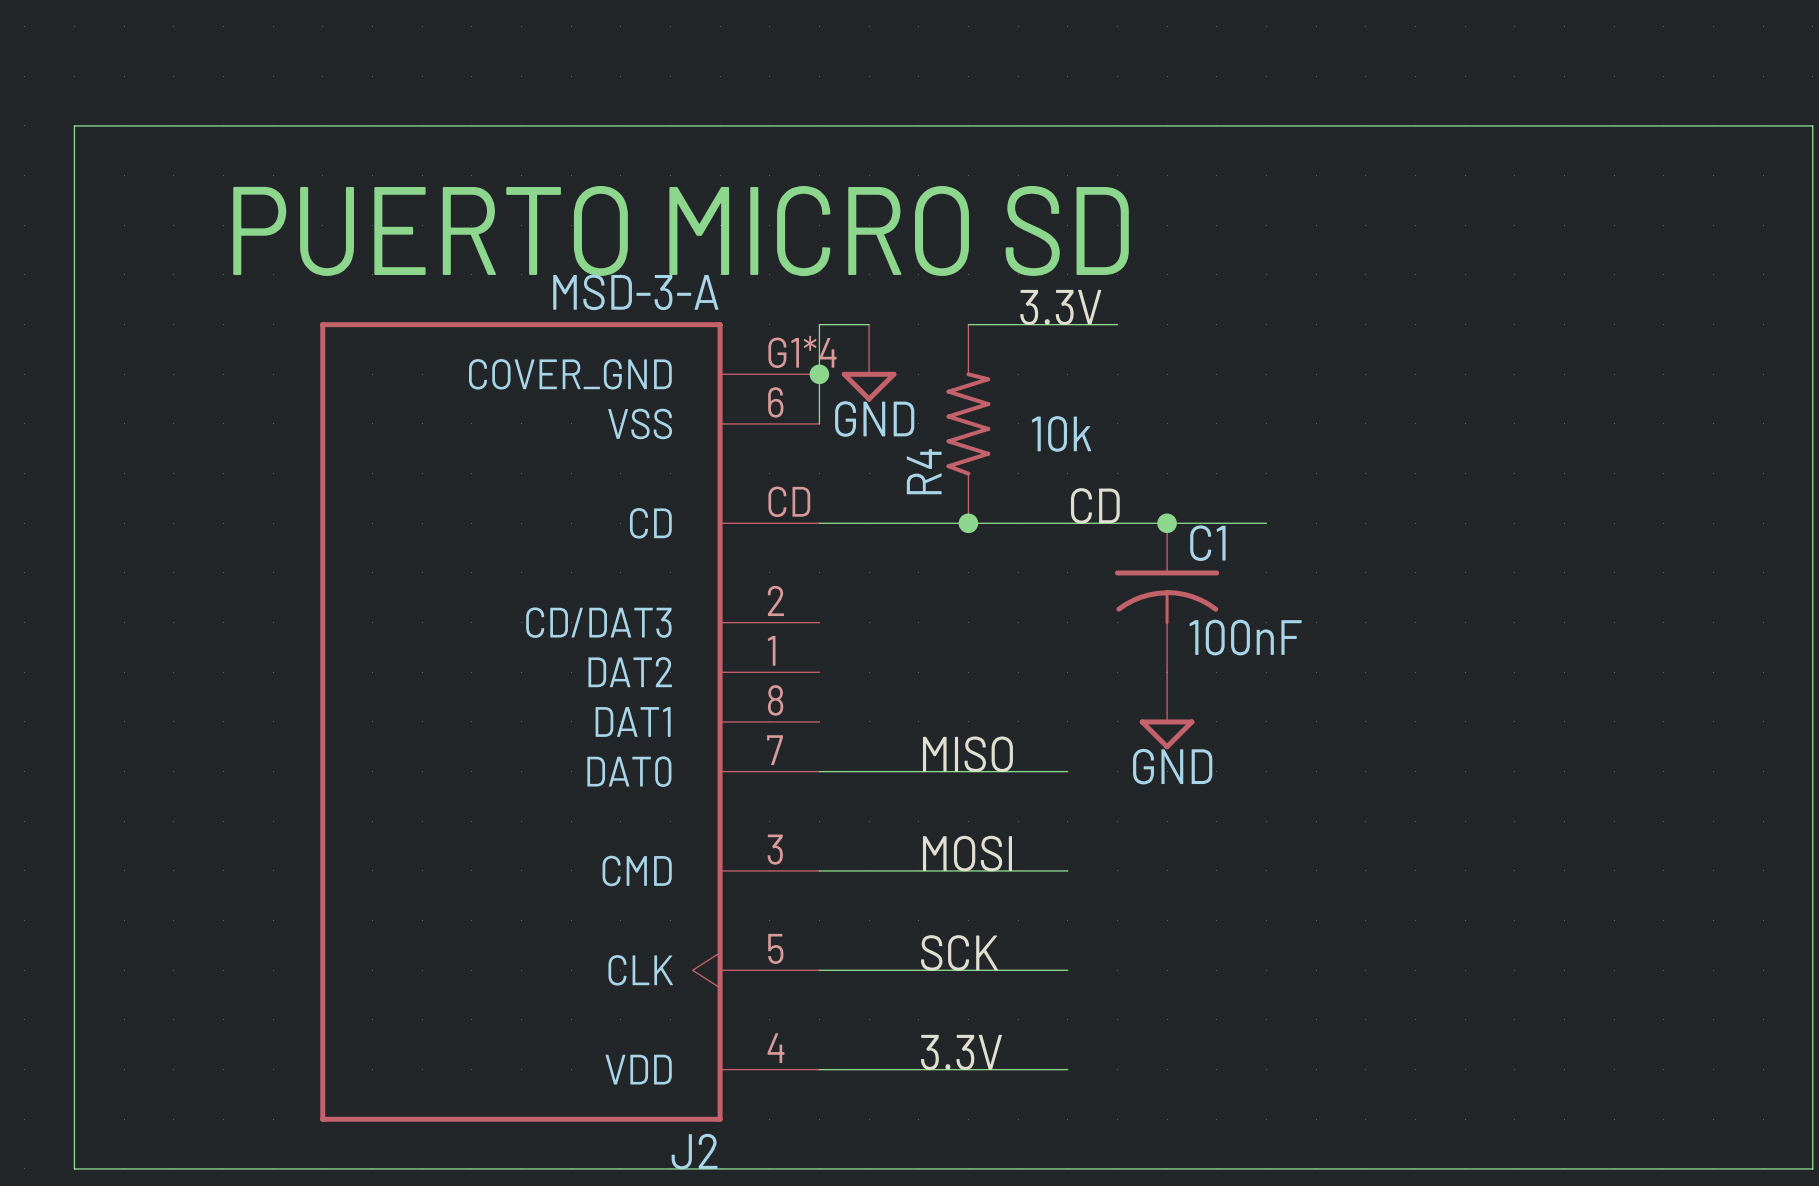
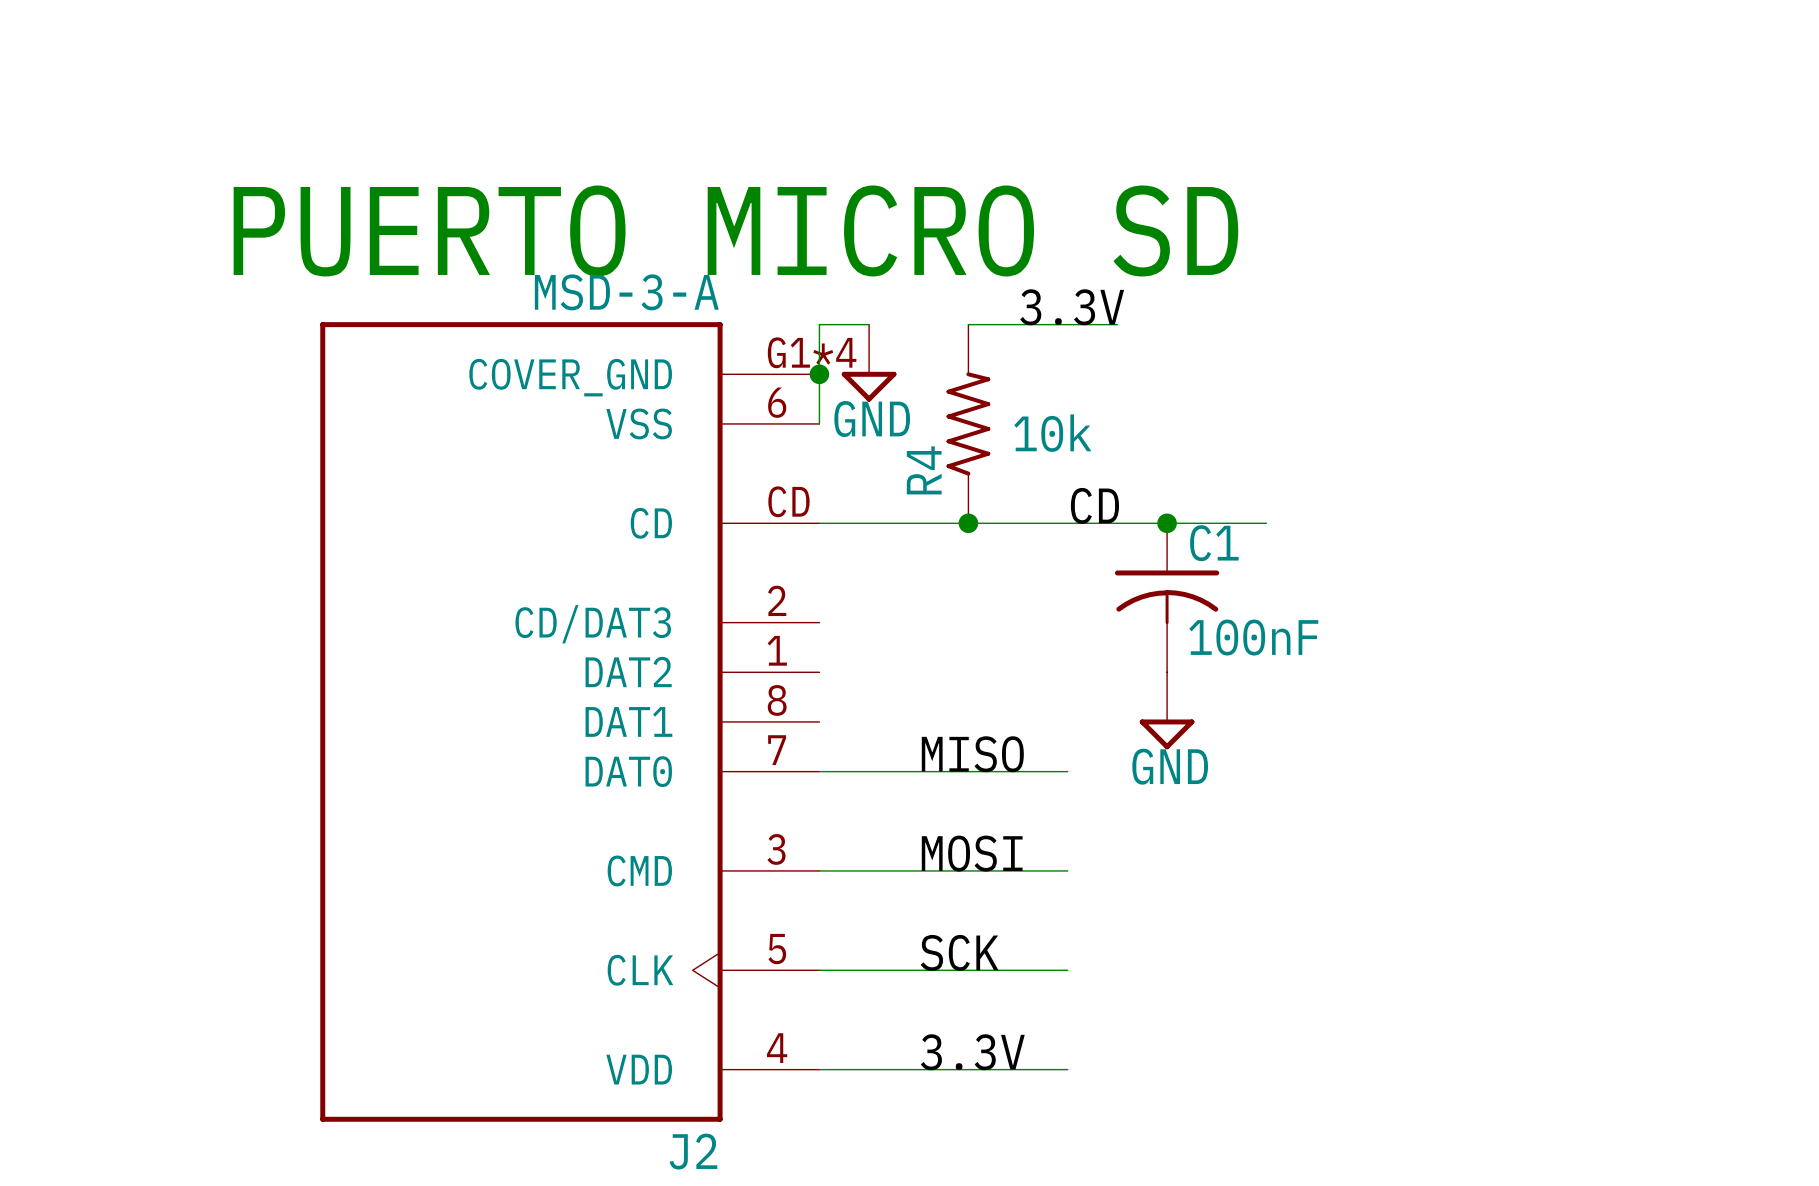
wire: (74, 125) (74, 1168) (1812, 1168) (1812, 125) (74, 125) -> none

